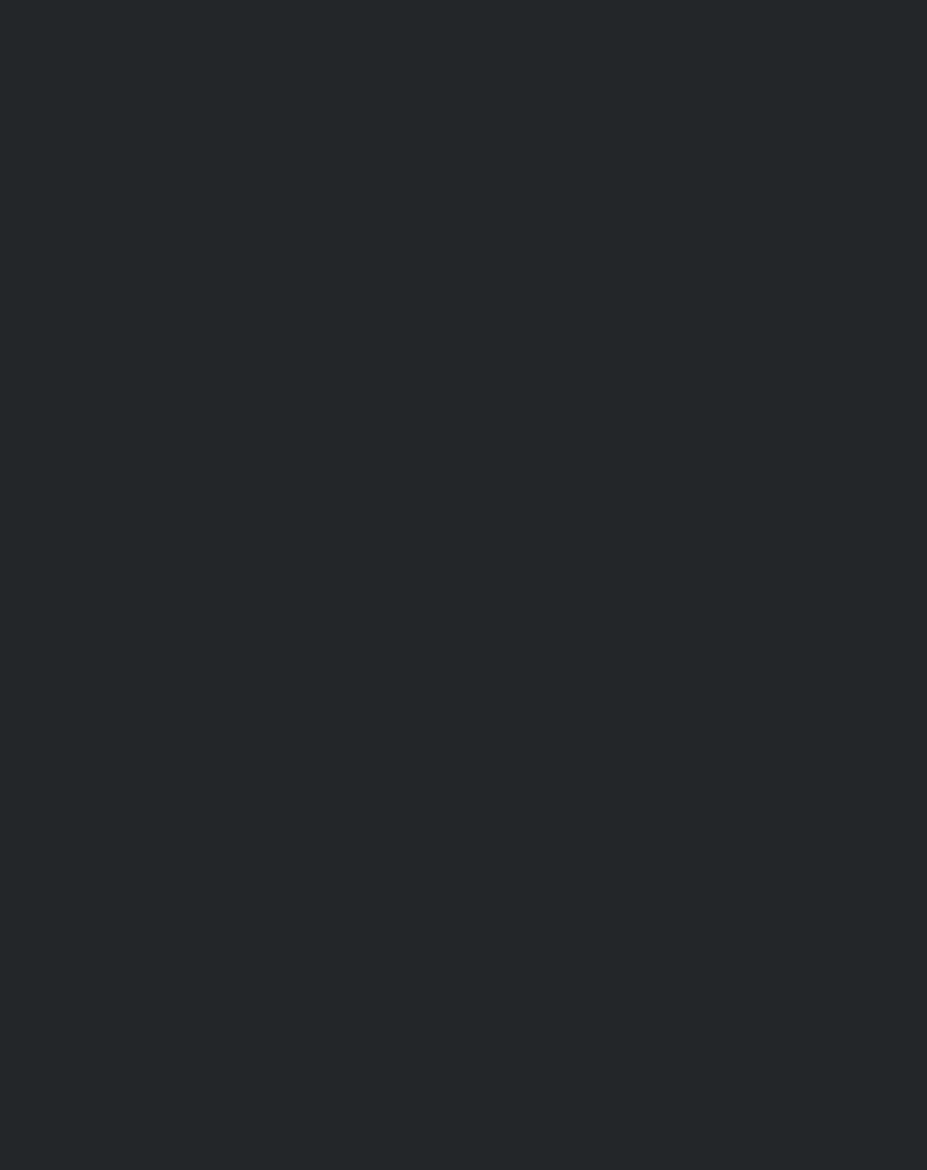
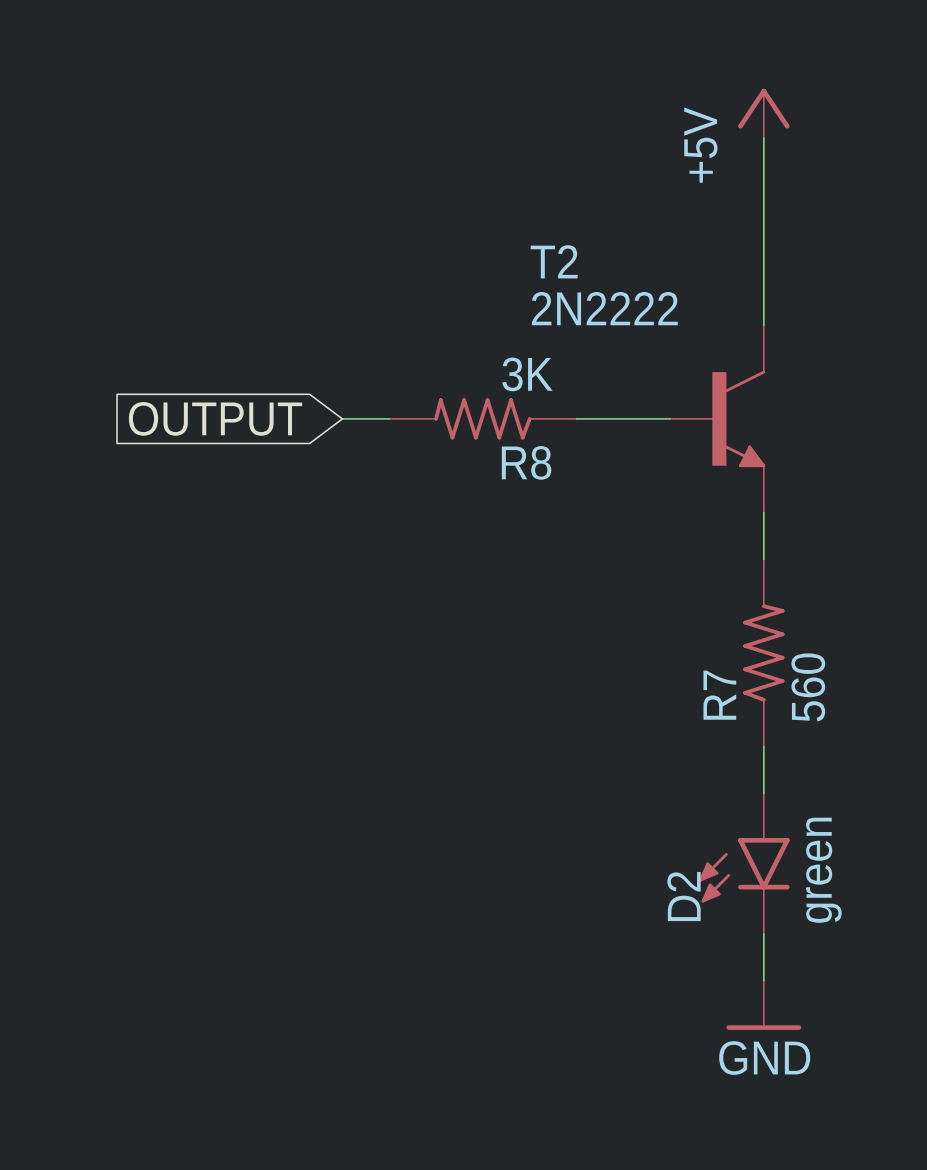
power symbol: none -> +5V (763, 113)
wire: none -> (763, 137) (763, 325)
global label: none -> OUTPUT (215, 418)
wire: none -> (342, 418) (389, 418)
R8: none -> 3K (482, 418)
wire: none -> (576, 418) (670, 418)
T2: none -> 2N2222 (717, 418)
wire: none -> (763, 512) (763, 559)
R7: none -> 560 (763, 653)
wire: none -> (763, 746) (763, 793)
D2: none -> green (744, 863)
wire: none -> (763, 933) (763, 980)
power symbol: none -> GND (763, 1005)

